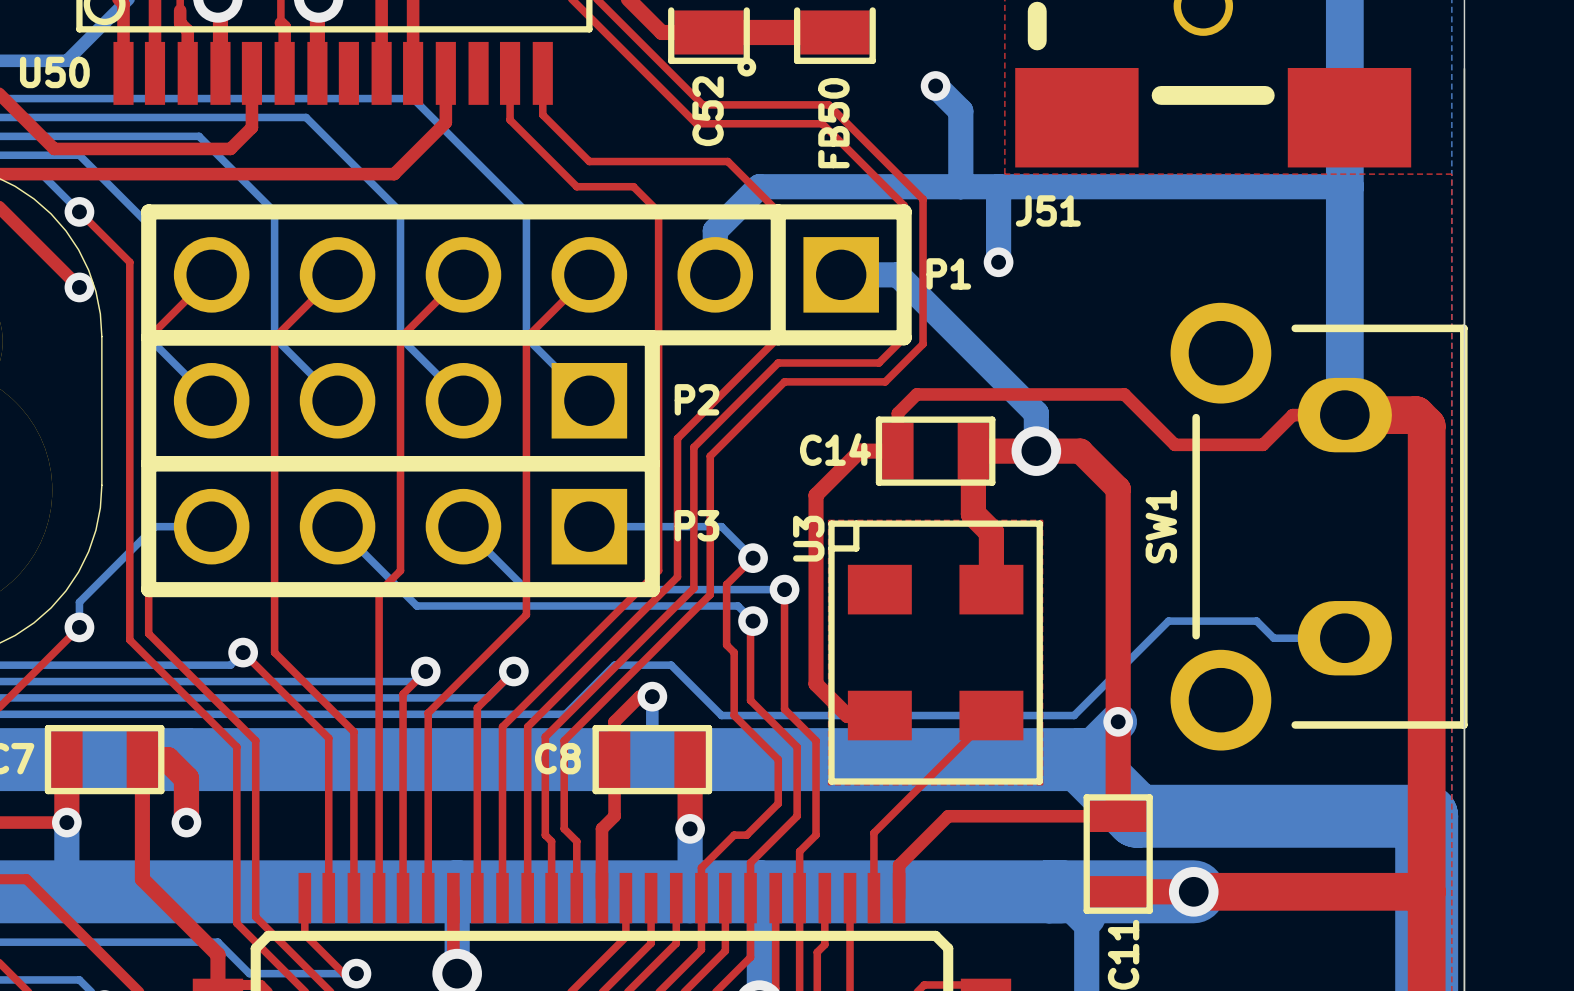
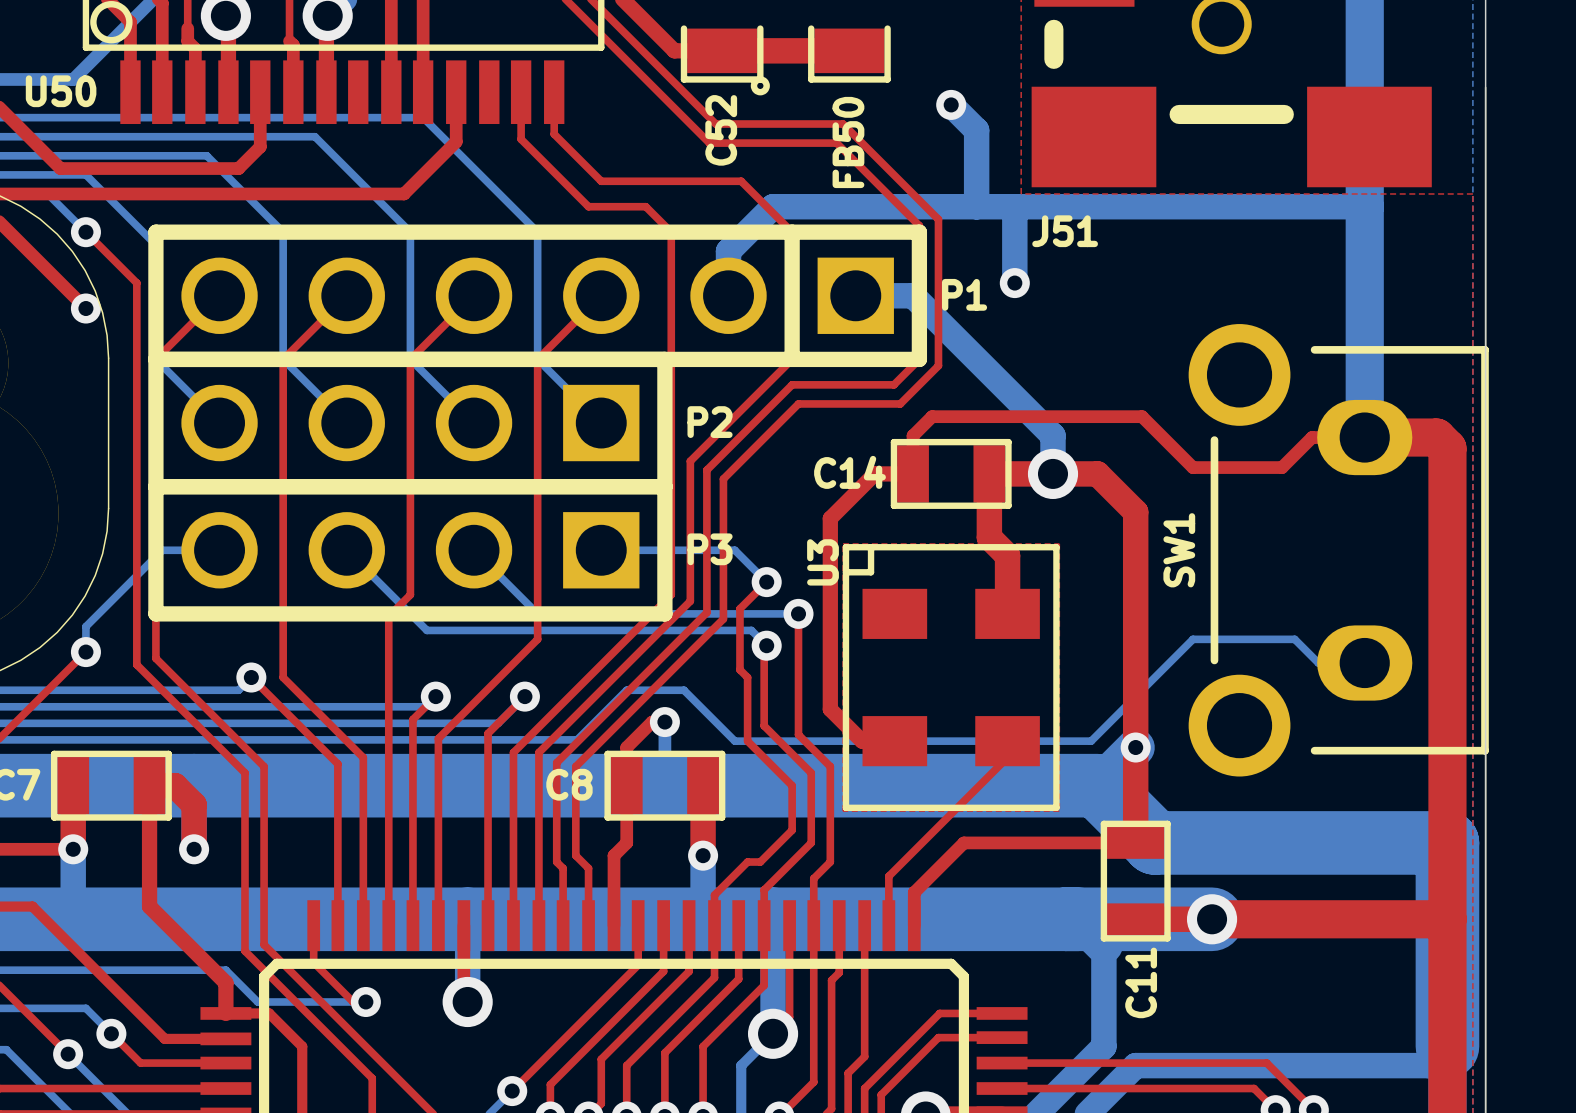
bottom track: (1168, 621) (1256, 621) (1273, 638) (1299, 638) -> (1186, 645) (1192, 639) (1294, 639) (1318, 663)
top track: (991, 715) (873, 833) (873, 849) -> (1023, 741) (888, 876)

